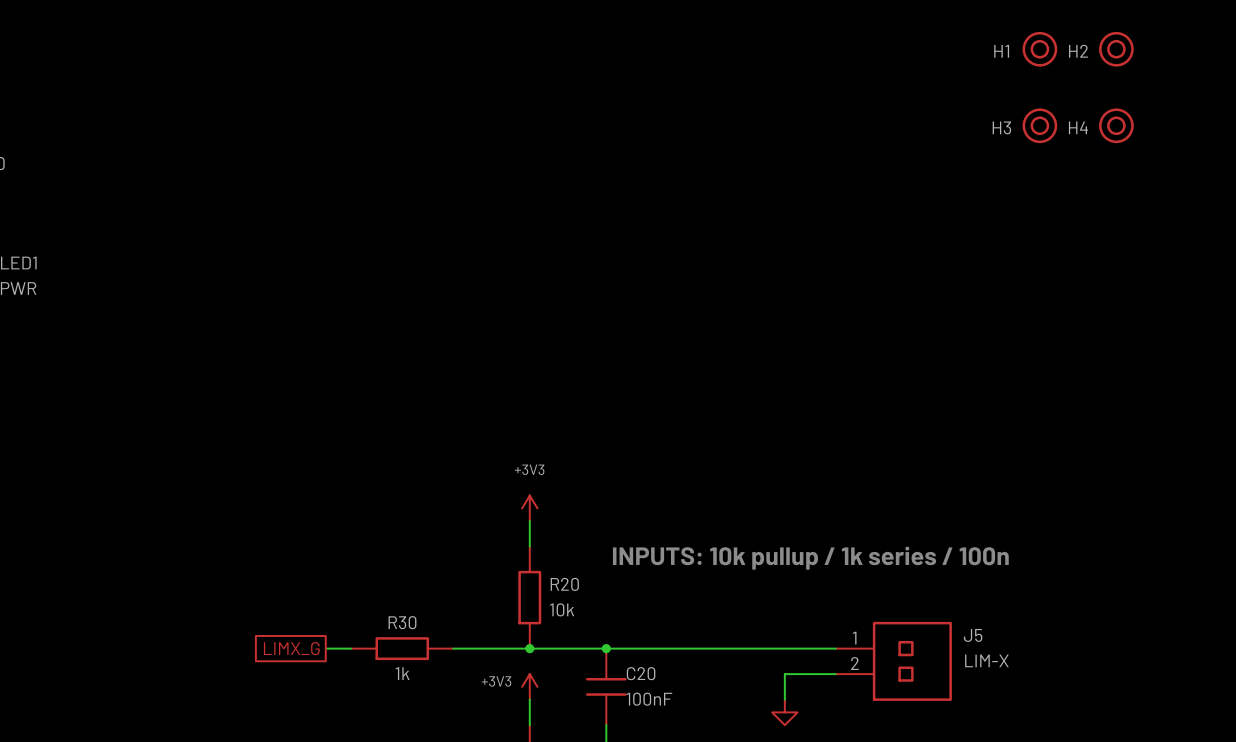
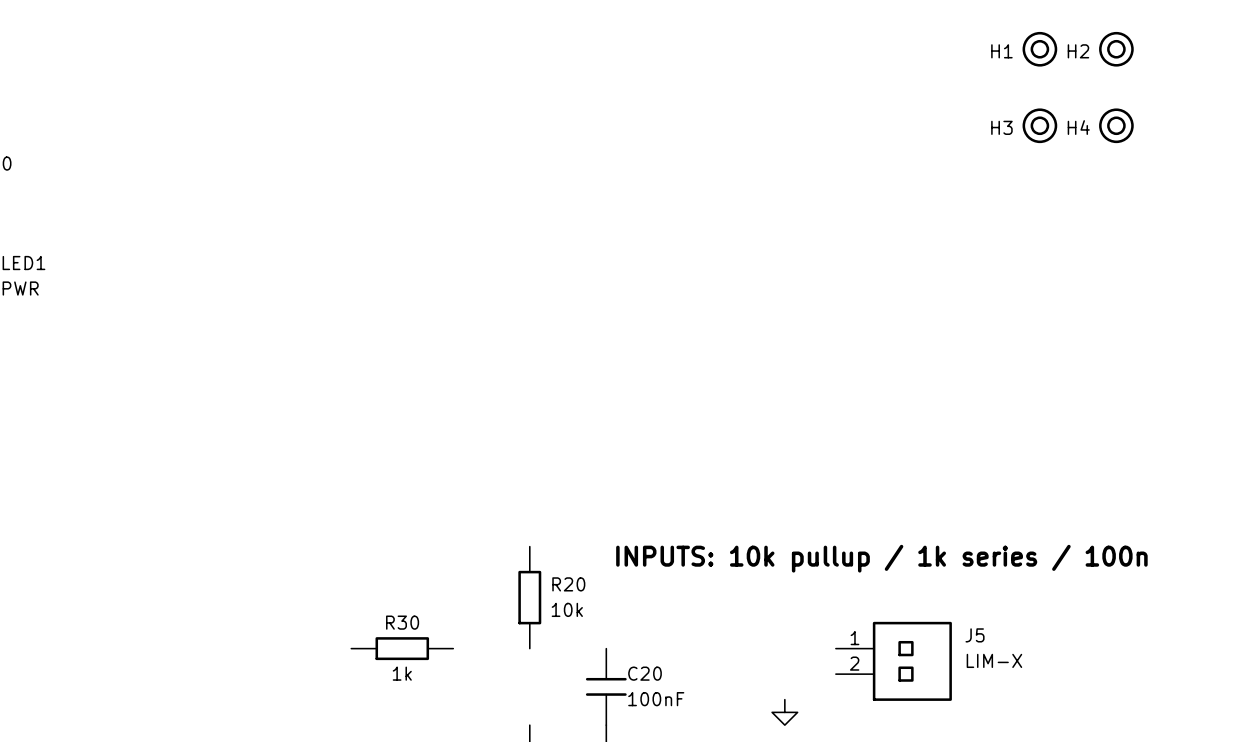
power symbol: +3V3 (529, 508) -> none
wire: (529, 521) (529, 546) -> none
global label: LIMX_G (291, 648) -> none
wire: (325, 648) (351, 648) -> none
wire: (453, 648) (835, 648) -> none
junction: (529, 648) -> none
junction: (606, 648) -> none
wire: (835, 674) (784, 674) (784, 699) -> none
power symbol: +3V3 (529, 686) -> none
wire: (529, 699) (529, 725) -> none

